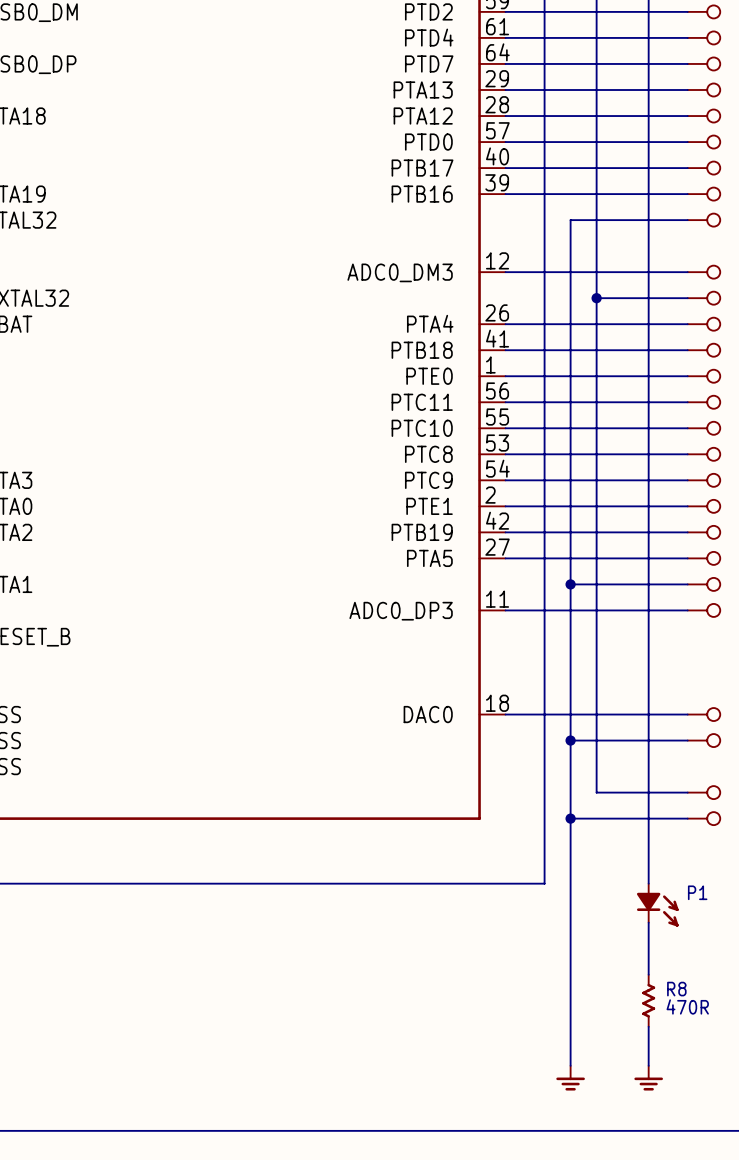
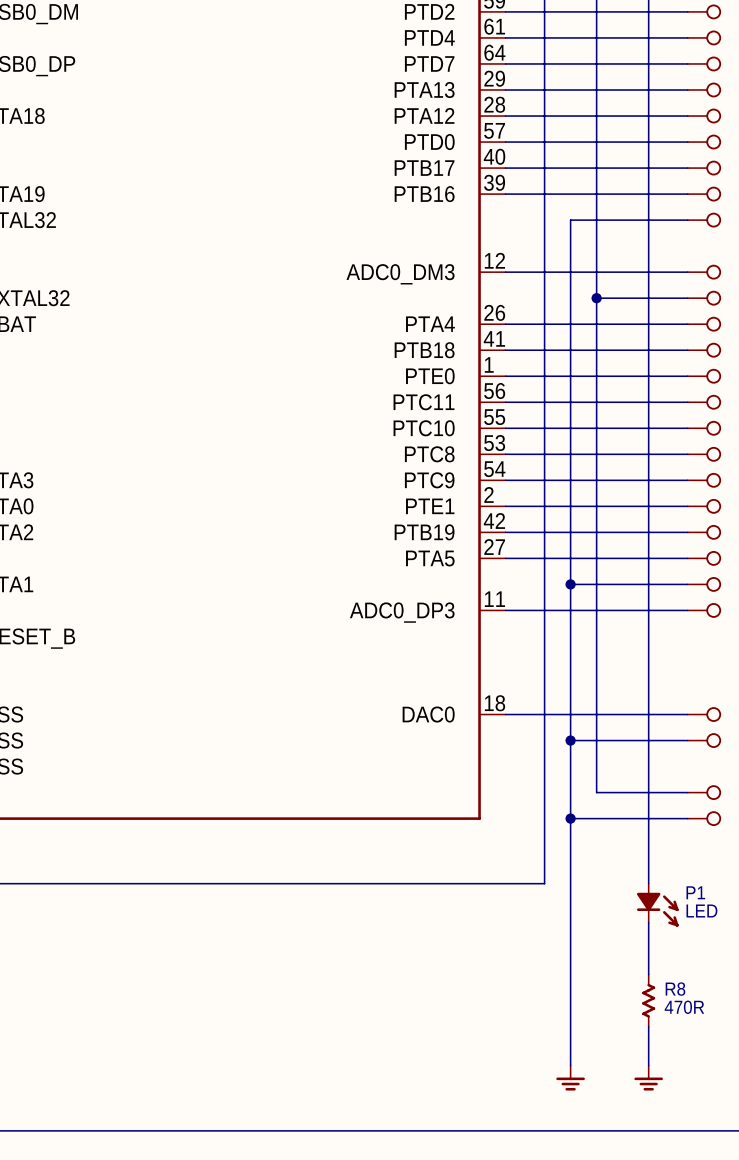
P1 value: none -> LED (701, 910)

